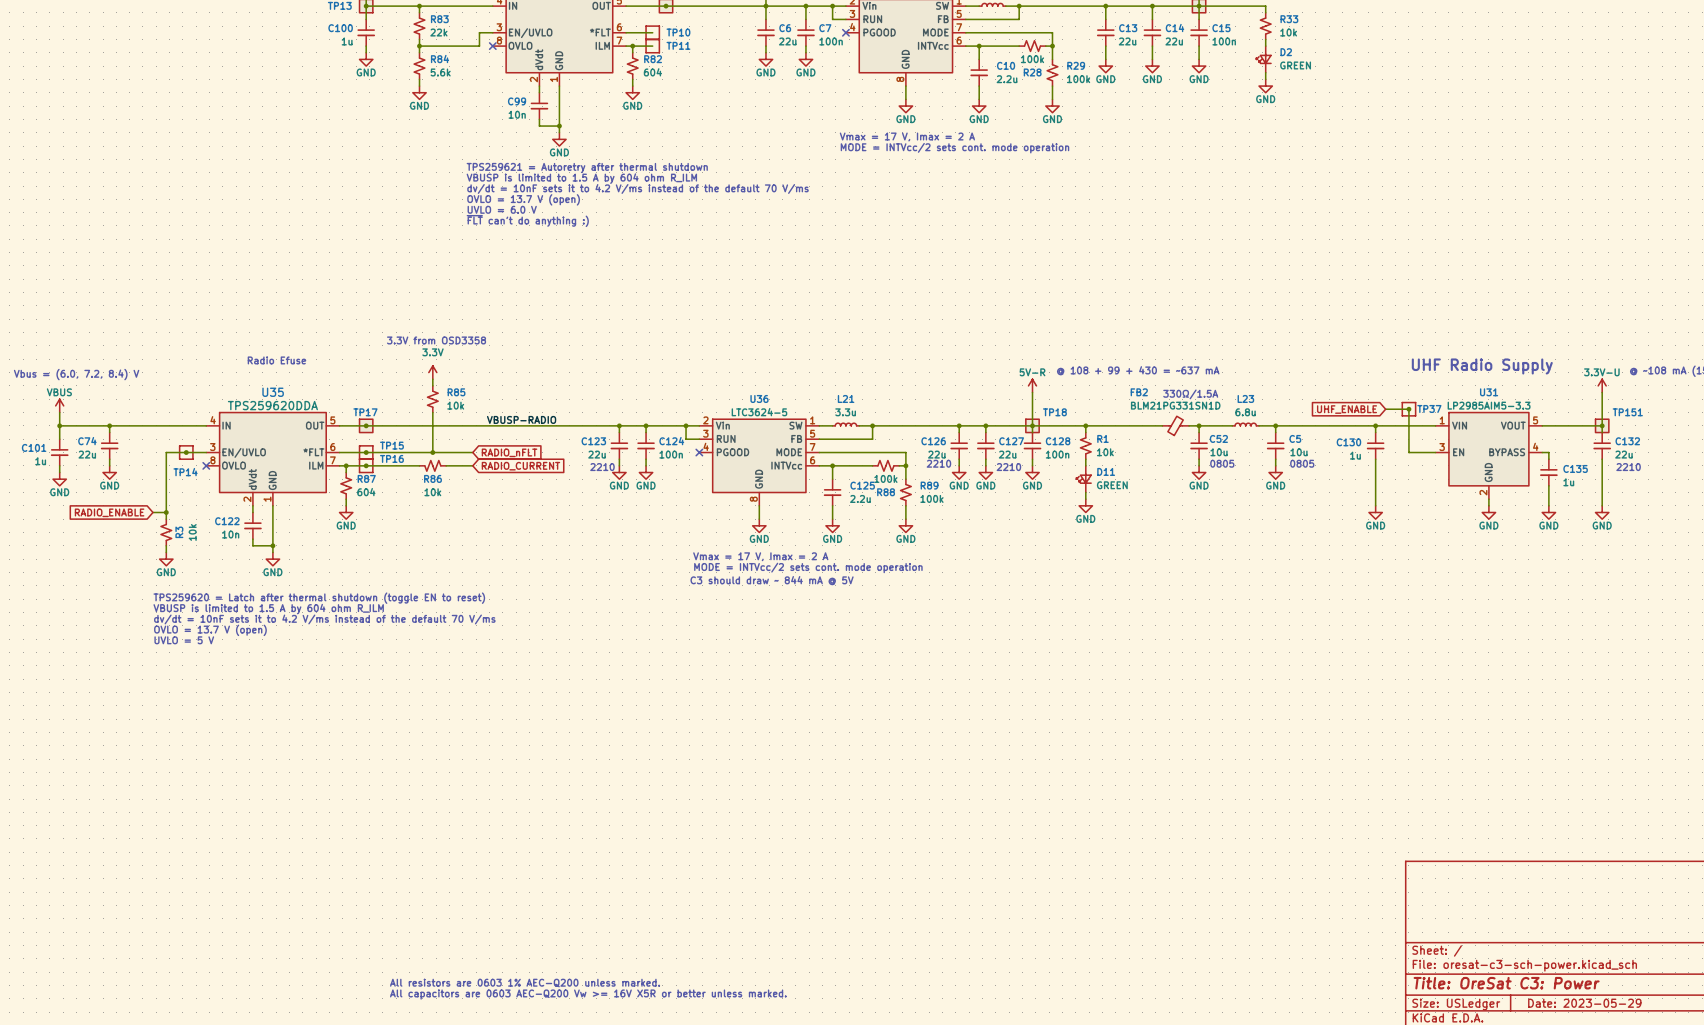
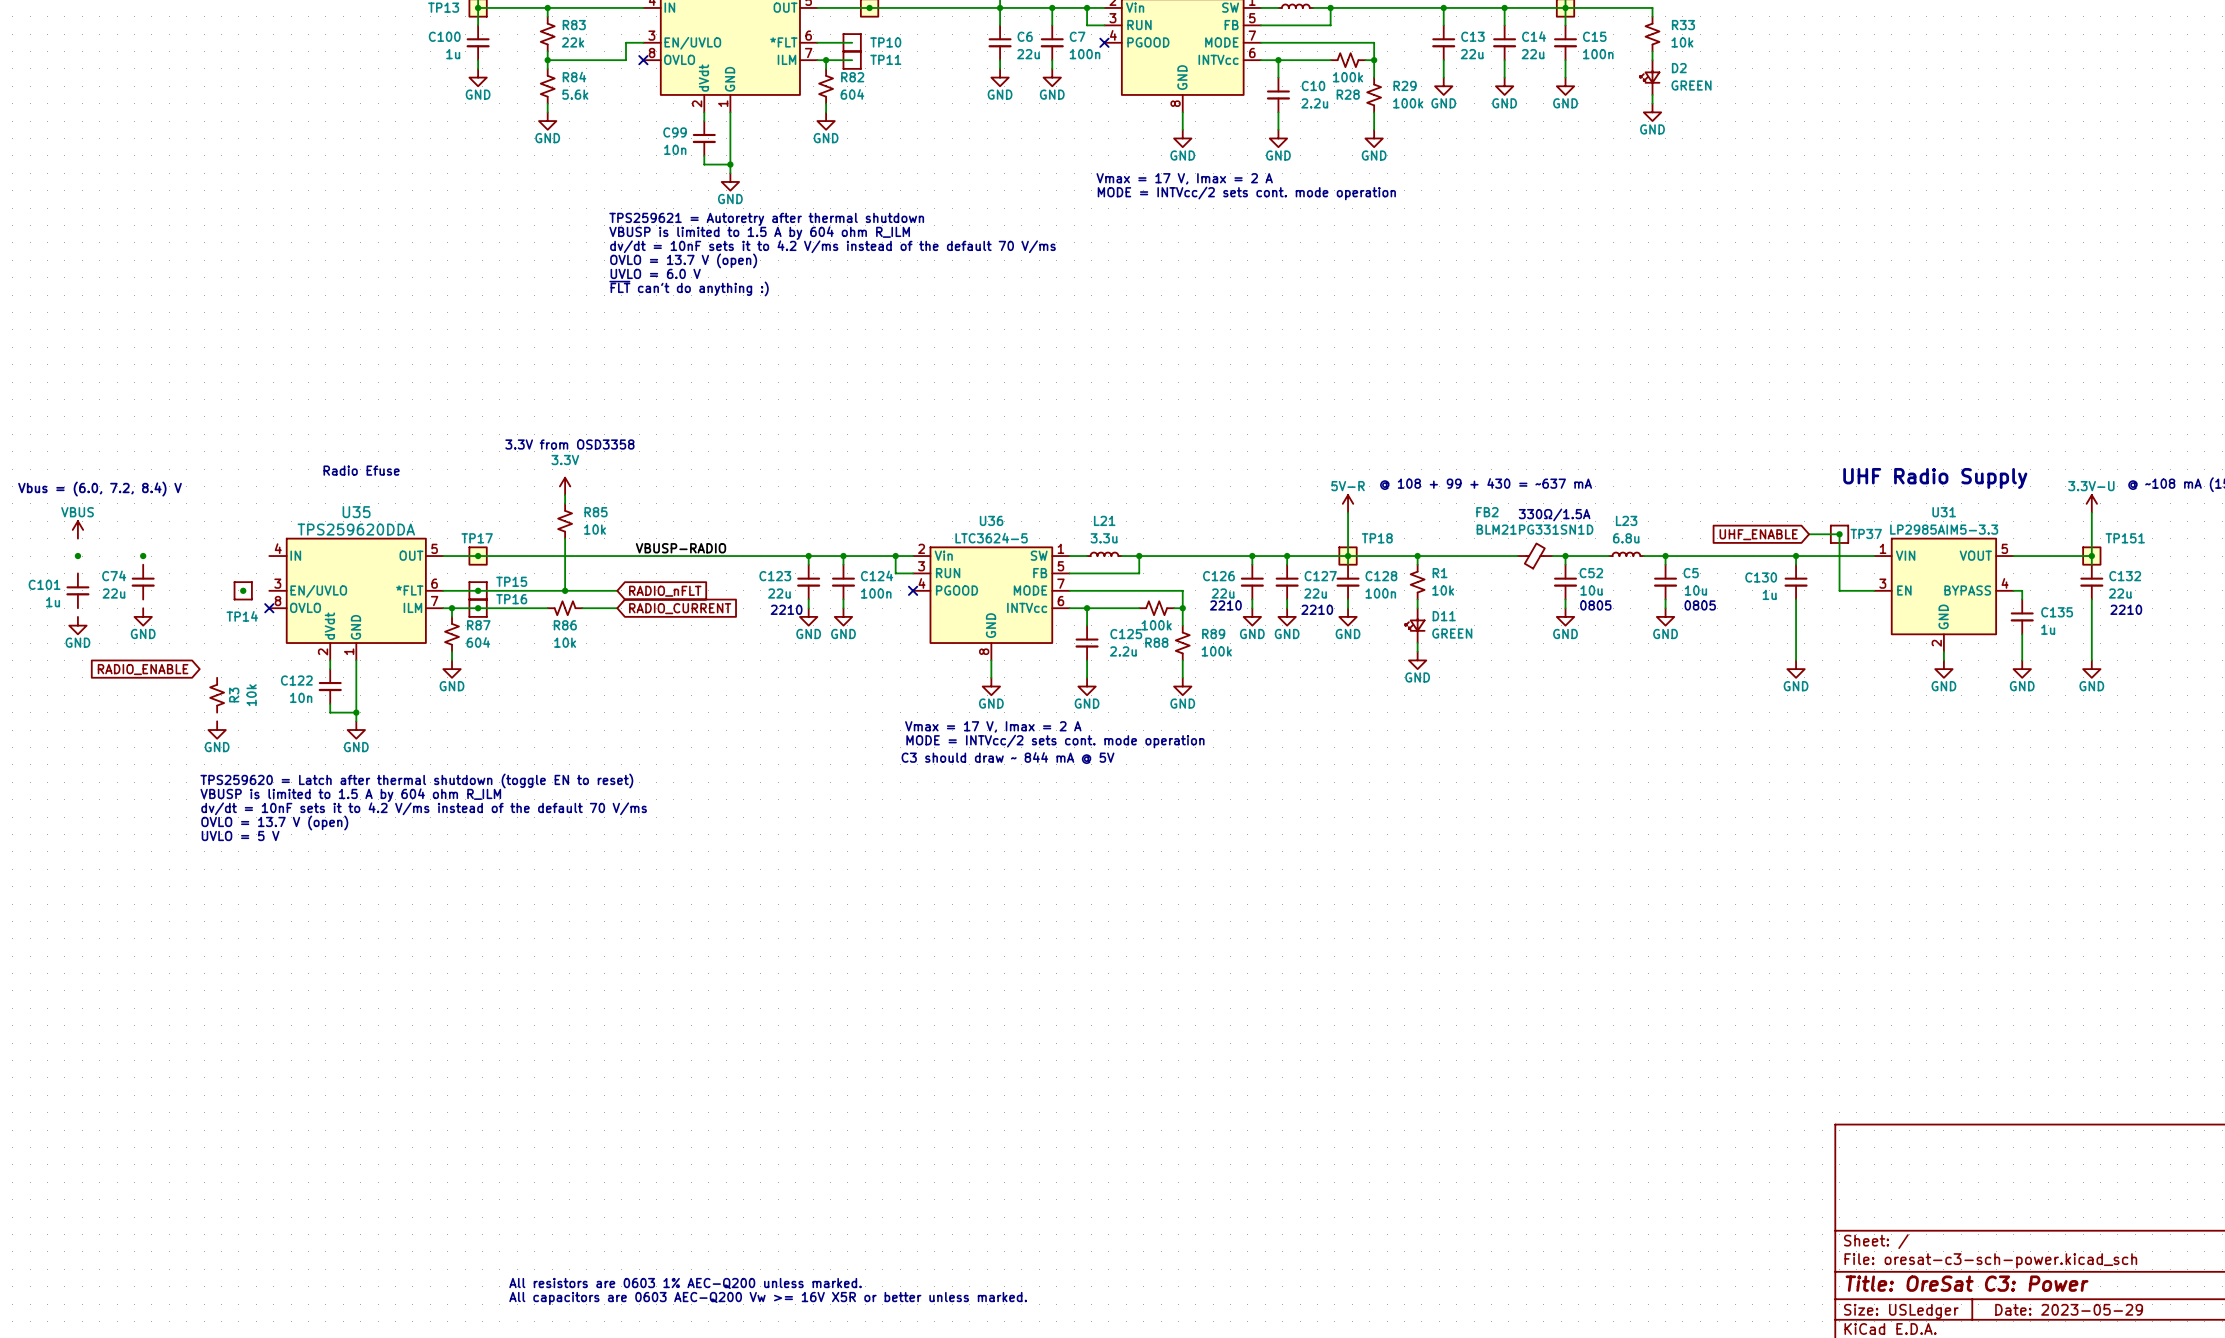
wire: (59, 412) (59, 439) -> none
wire: (59, 425) (206, 425) -> none
wire: (109, 425) (109, 432) -> none
wire: (206, 452) (166, 452) (166, 519) -> none
wire: (109, 459) (109, 465) -> none
wire: (59, 465) (59, 472) -> none
wire: (152, 512) (166, 512) -> none
junction: (166, 512) -> none
wire: (166, 545) (166, 552) -> none

